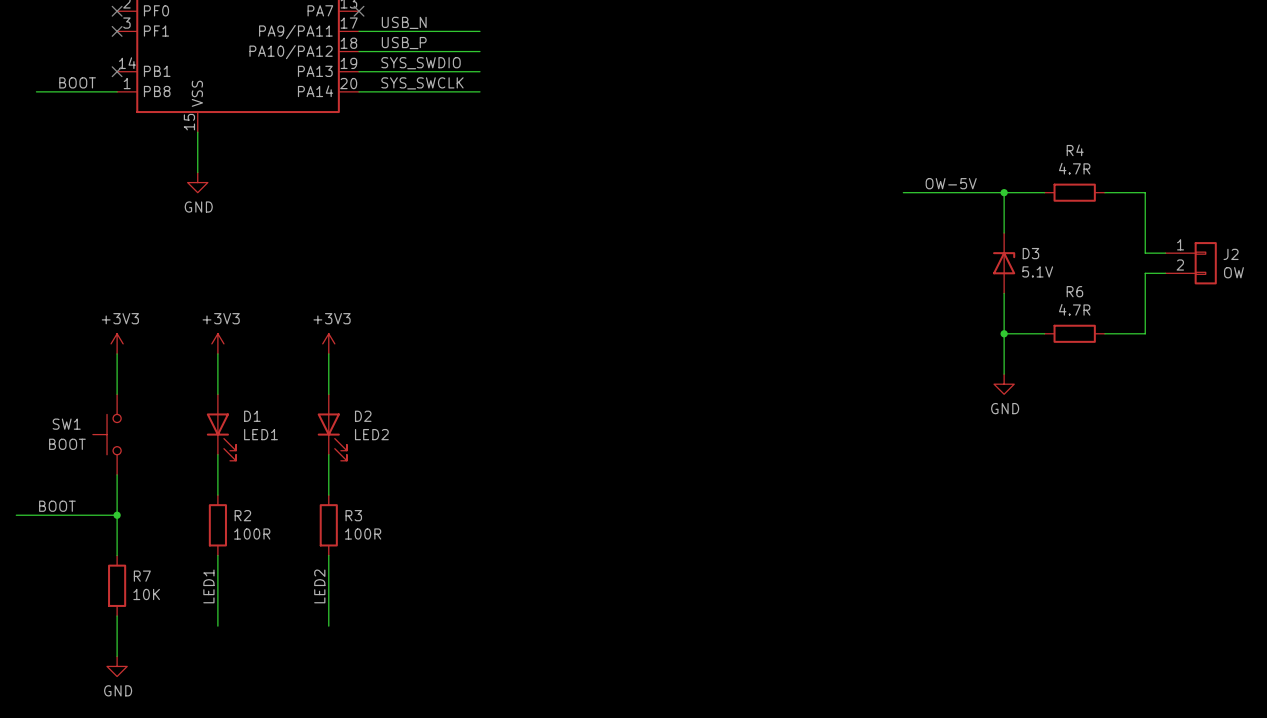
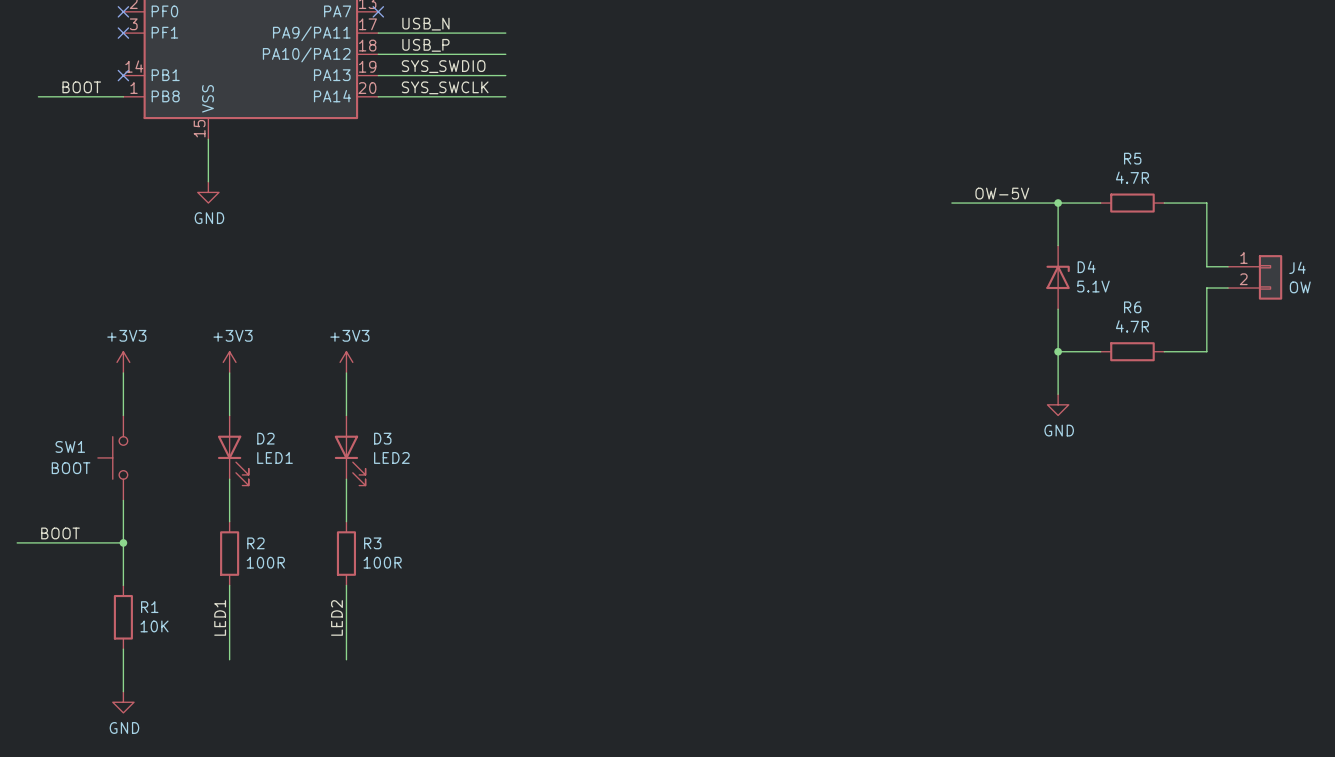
R4 name: R4 (1075, 150) -> R5 (1132, 158)
D3 name: D3 (1030, 253) -> D4 (1086, 266)
J2 name: J2 (1231, 254) -> J4 (1297, 267)
D1 name: D1 (252, 416) -> D2 (265, 438)
D2 name: D2 (363, 416) -> D3 (382, 438)
R7 name: R7 (142, 576) -> R1 (149, 607)

